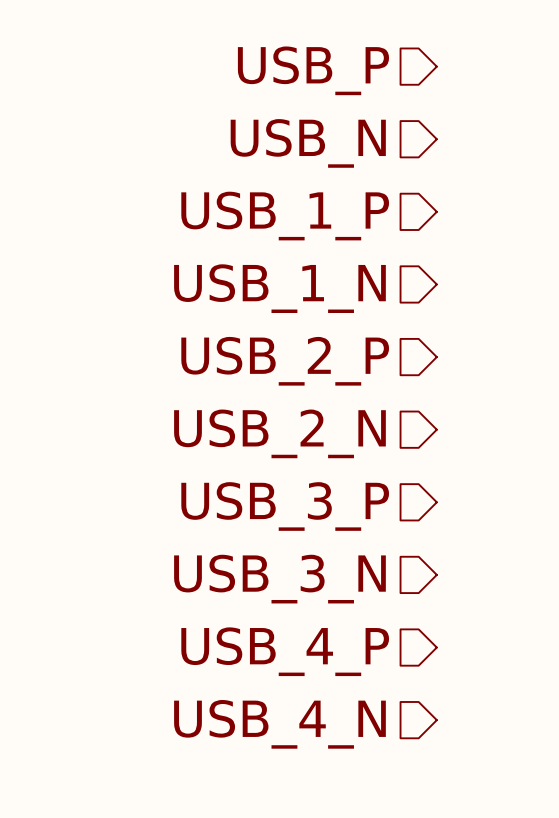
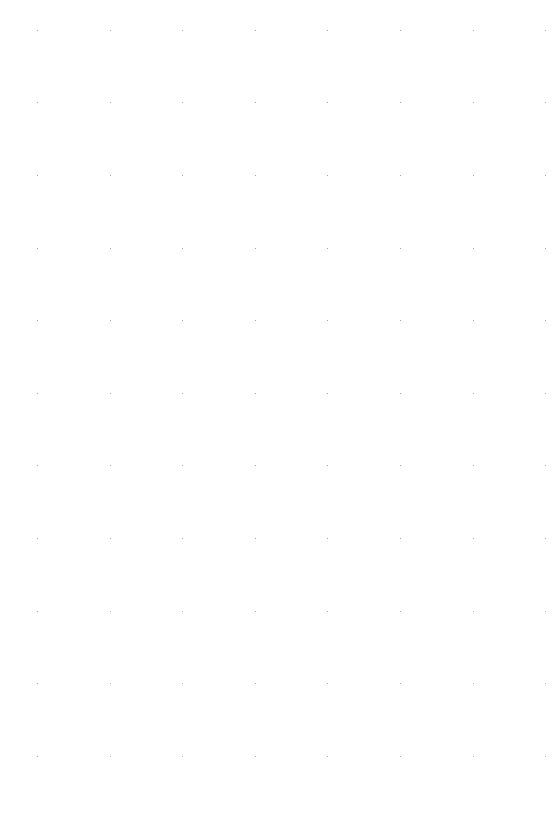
hierarchical label: USB_P (313, 70) -> none
hierarchical label: USB_N (308, 143) -> none
hierarchical label: USB_1_P (285, 216) -> none
hierarchical label: USB_1_N (279, 288) -> none
hierarchical label: USB_2_P (285, 361) -> none
hierarchical label: USB_2_N (279, 433) -> none
hierarchical label: USB_3_P (285, 506) -> none
hierarchical label: USB_3_N (279, 579) -> none
hierarchical label: USB_4_P (285, 651) -> none
hierarchical label: USB_4_N (279, 724) -> none

